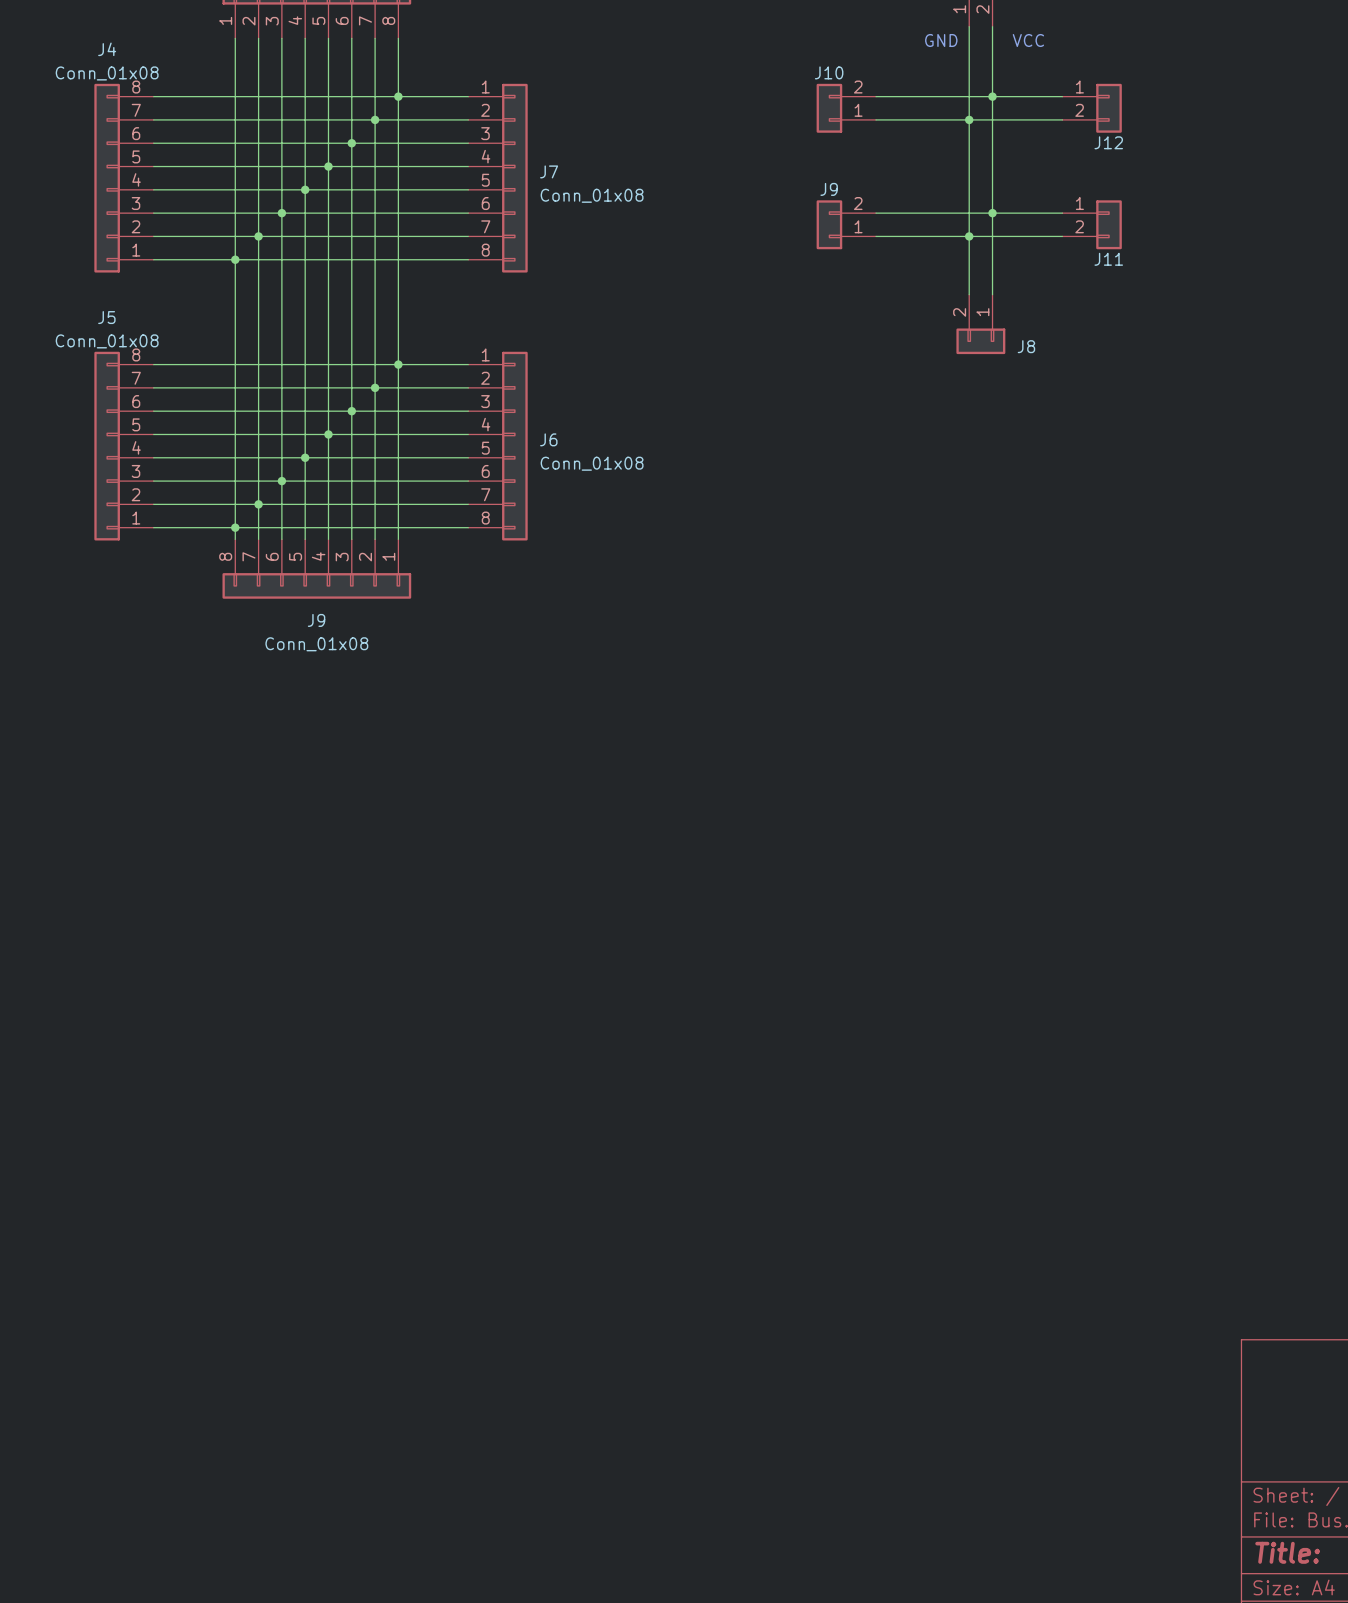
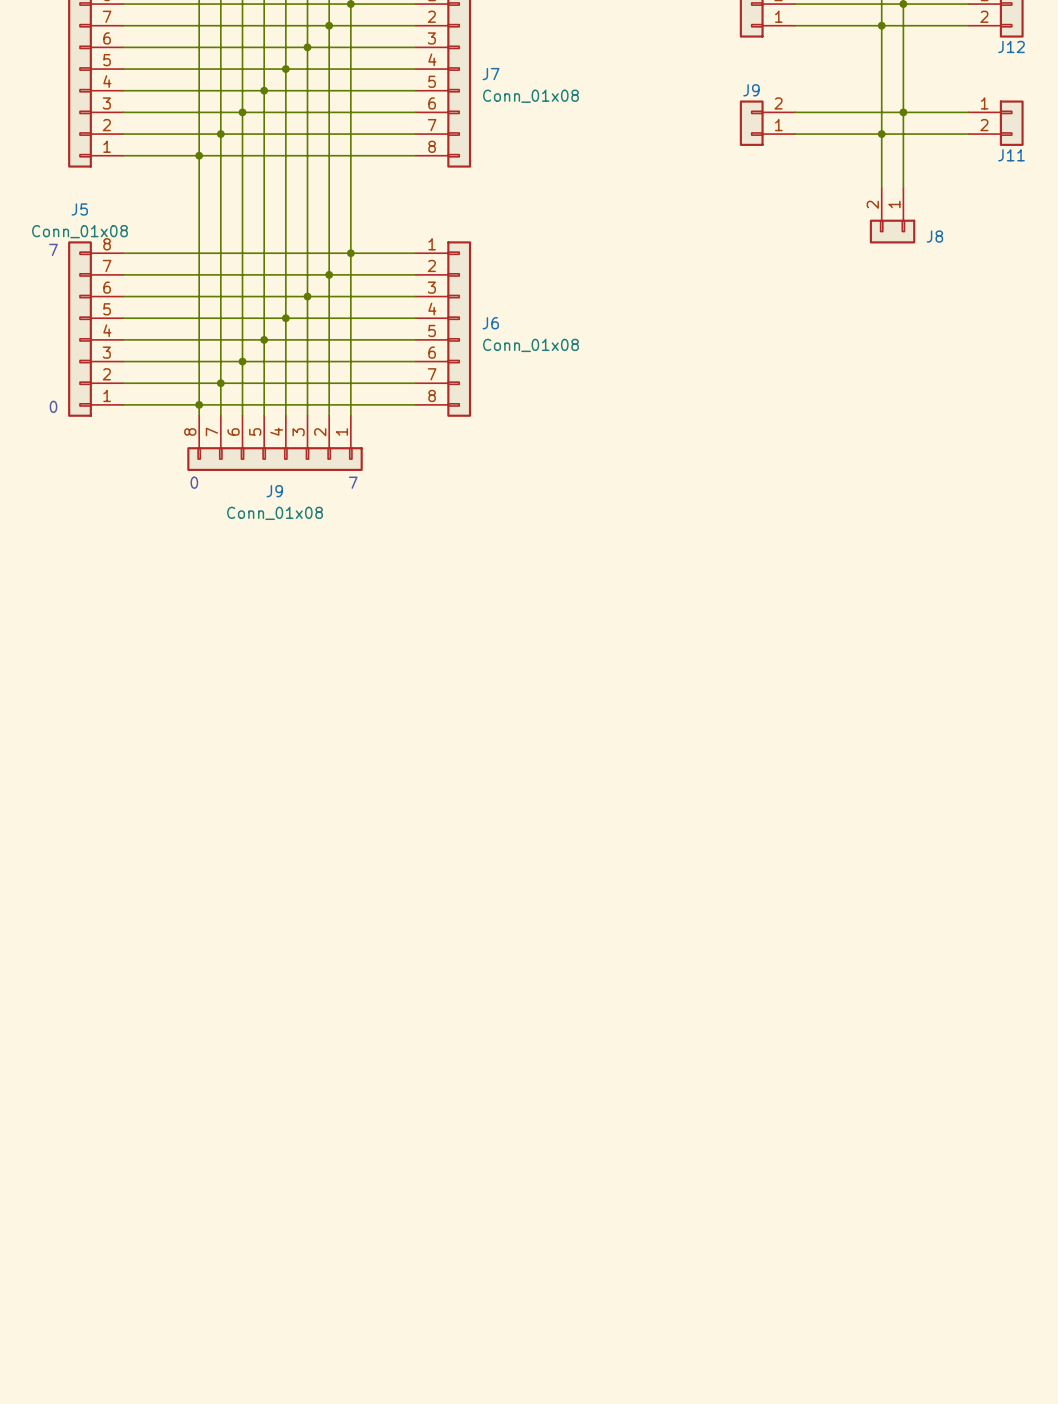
text: none -> 7 (53, 249)
text: none -> 0 (53, 406)
text: none -> 0 7 (274, 482)

